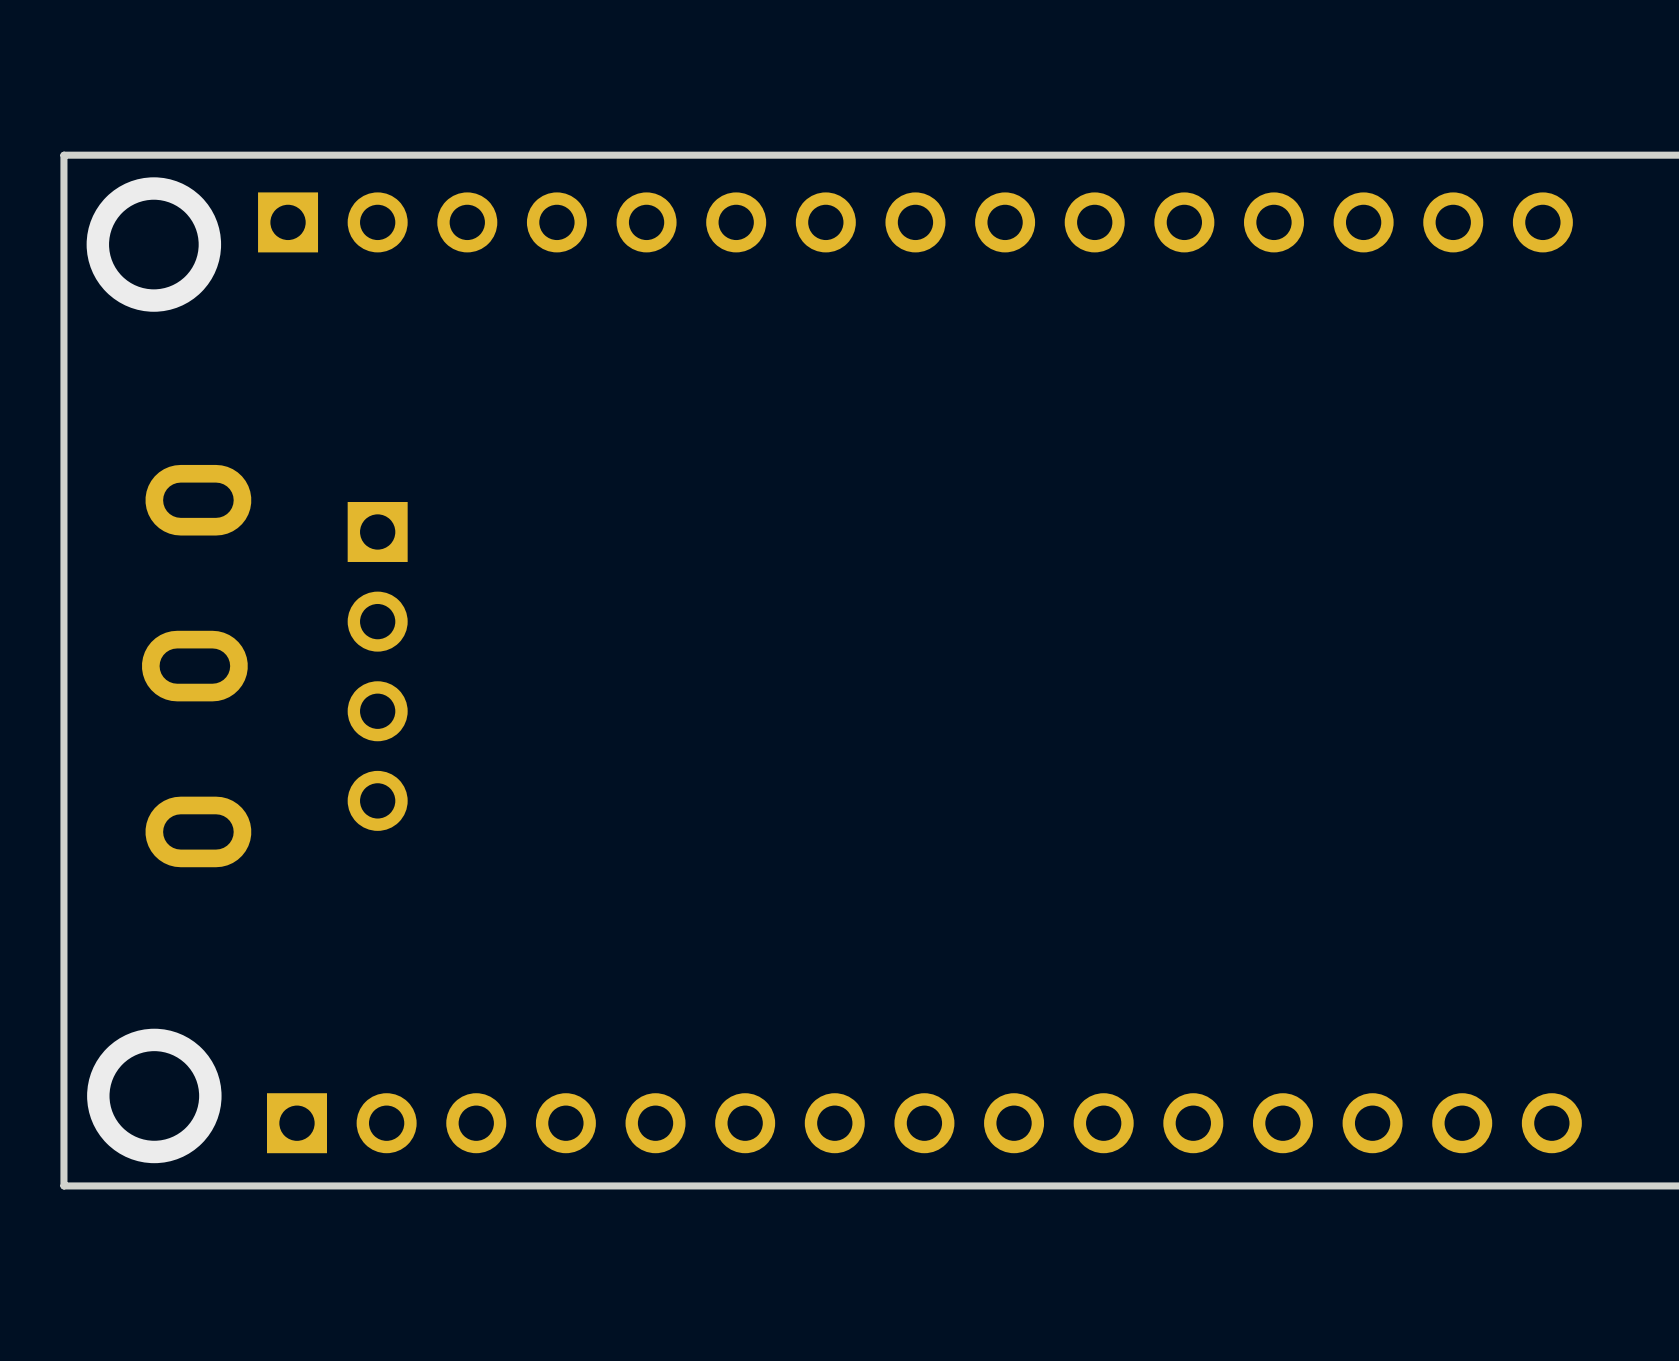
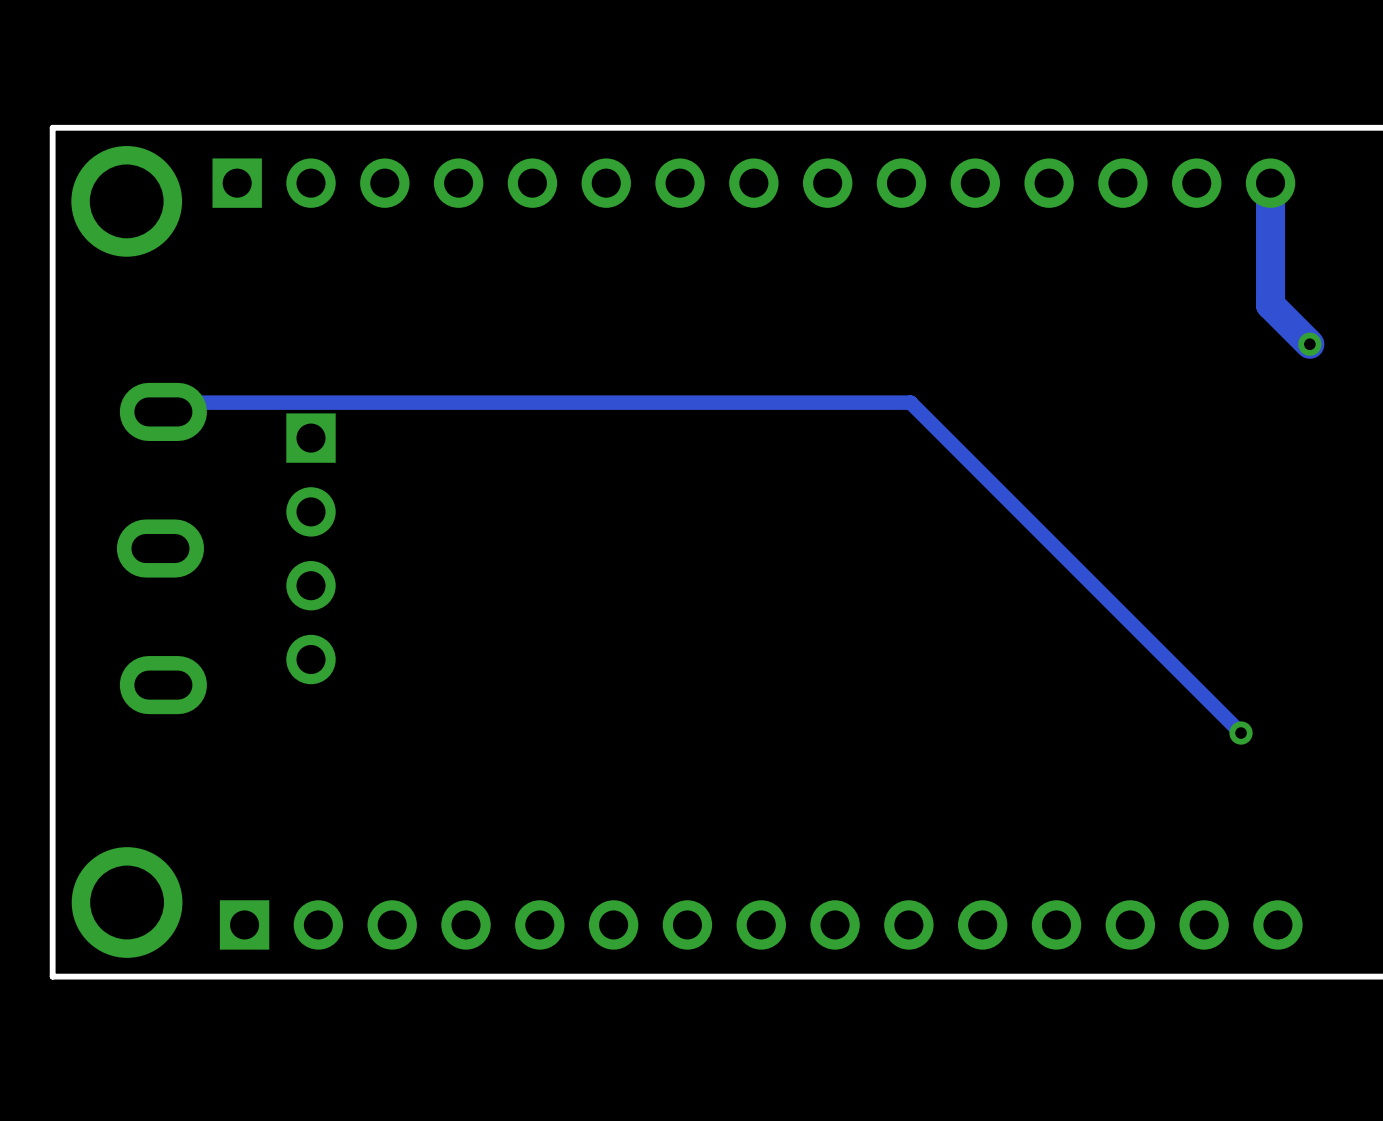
track: none -> (1270, 183) (1270, 304) (1309, 344)
via: none -> (1309, 344)
track: none -> (163, 411) (172, 402) (910, 402) (1241, 733)
via: none -> (1241, 733)

